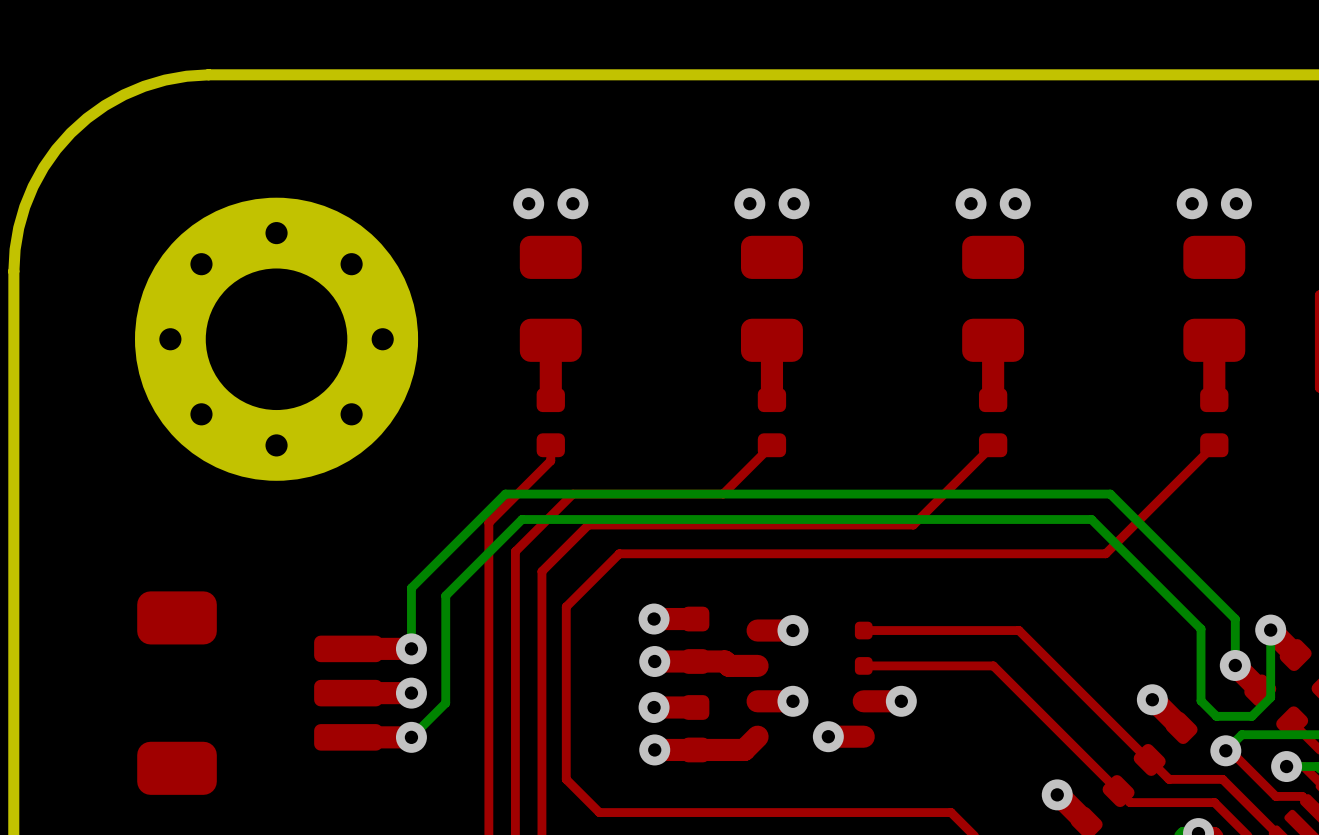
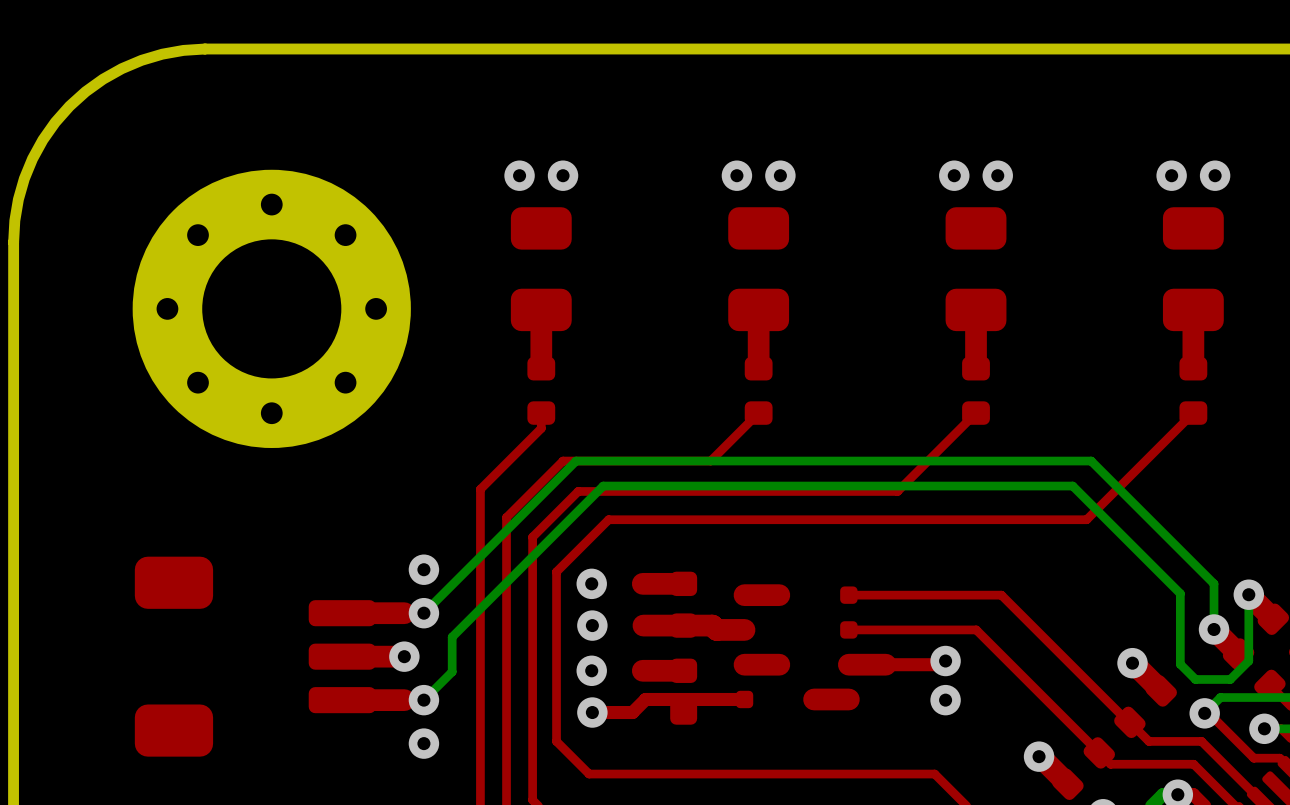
bottom track: (586, 494) (505, 494) (411, 588) (411, 648) -> (576, 461) (423, 613)
bottom track: (613, 519) (522, 519) (445, 595) (445, 703) (411, 737) -> (603, 486) (452, 637) (452, 671) (423, 700)
via: none -> (423, 569)
via: none -> (591, 583)
via: (654, 619) -> none
via: (792, 630) -> none
via position: (411, 648) -> (423, 613)
via: none -> (592, 625)
via: (654, 661) -> none
top track: none -> (945, 661) (941, 664) (885, 664)
via: none -> (945, 661)
via: (792, 701) -> none
via: (901, 701) -> none
via: none -> (591, 670)
via: (654, 707) -> none
top track: (757, 736) (744, 749) (654, 749) -> (744, 699) (645, 699) (632, 712) (592, 712)
via: (828, 736) -> none
via position: (411, 737) -> (423, 700)
via: none -> (945, 700)
via: none -> (592, 712)
via: (654, 749) -> none
via: none -> (423, 743)

